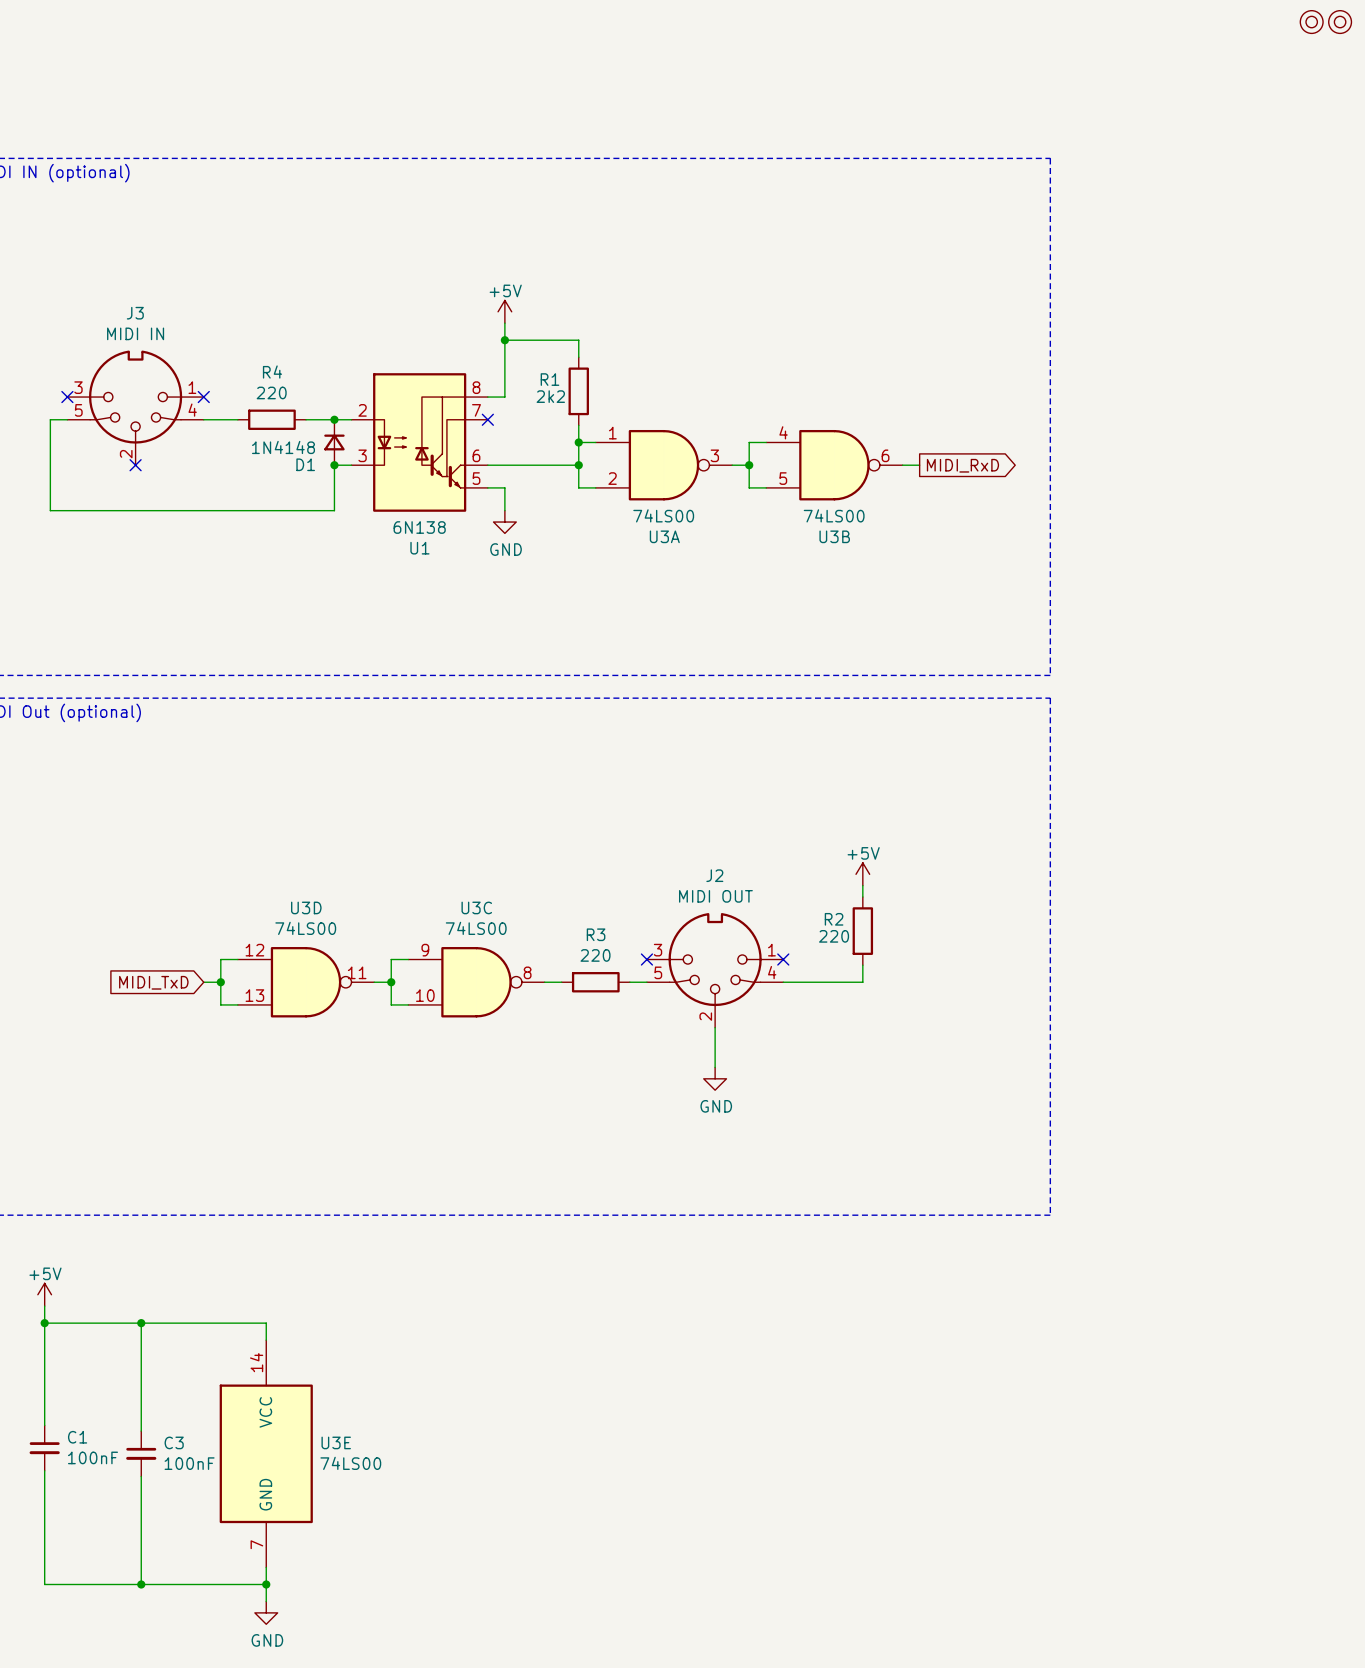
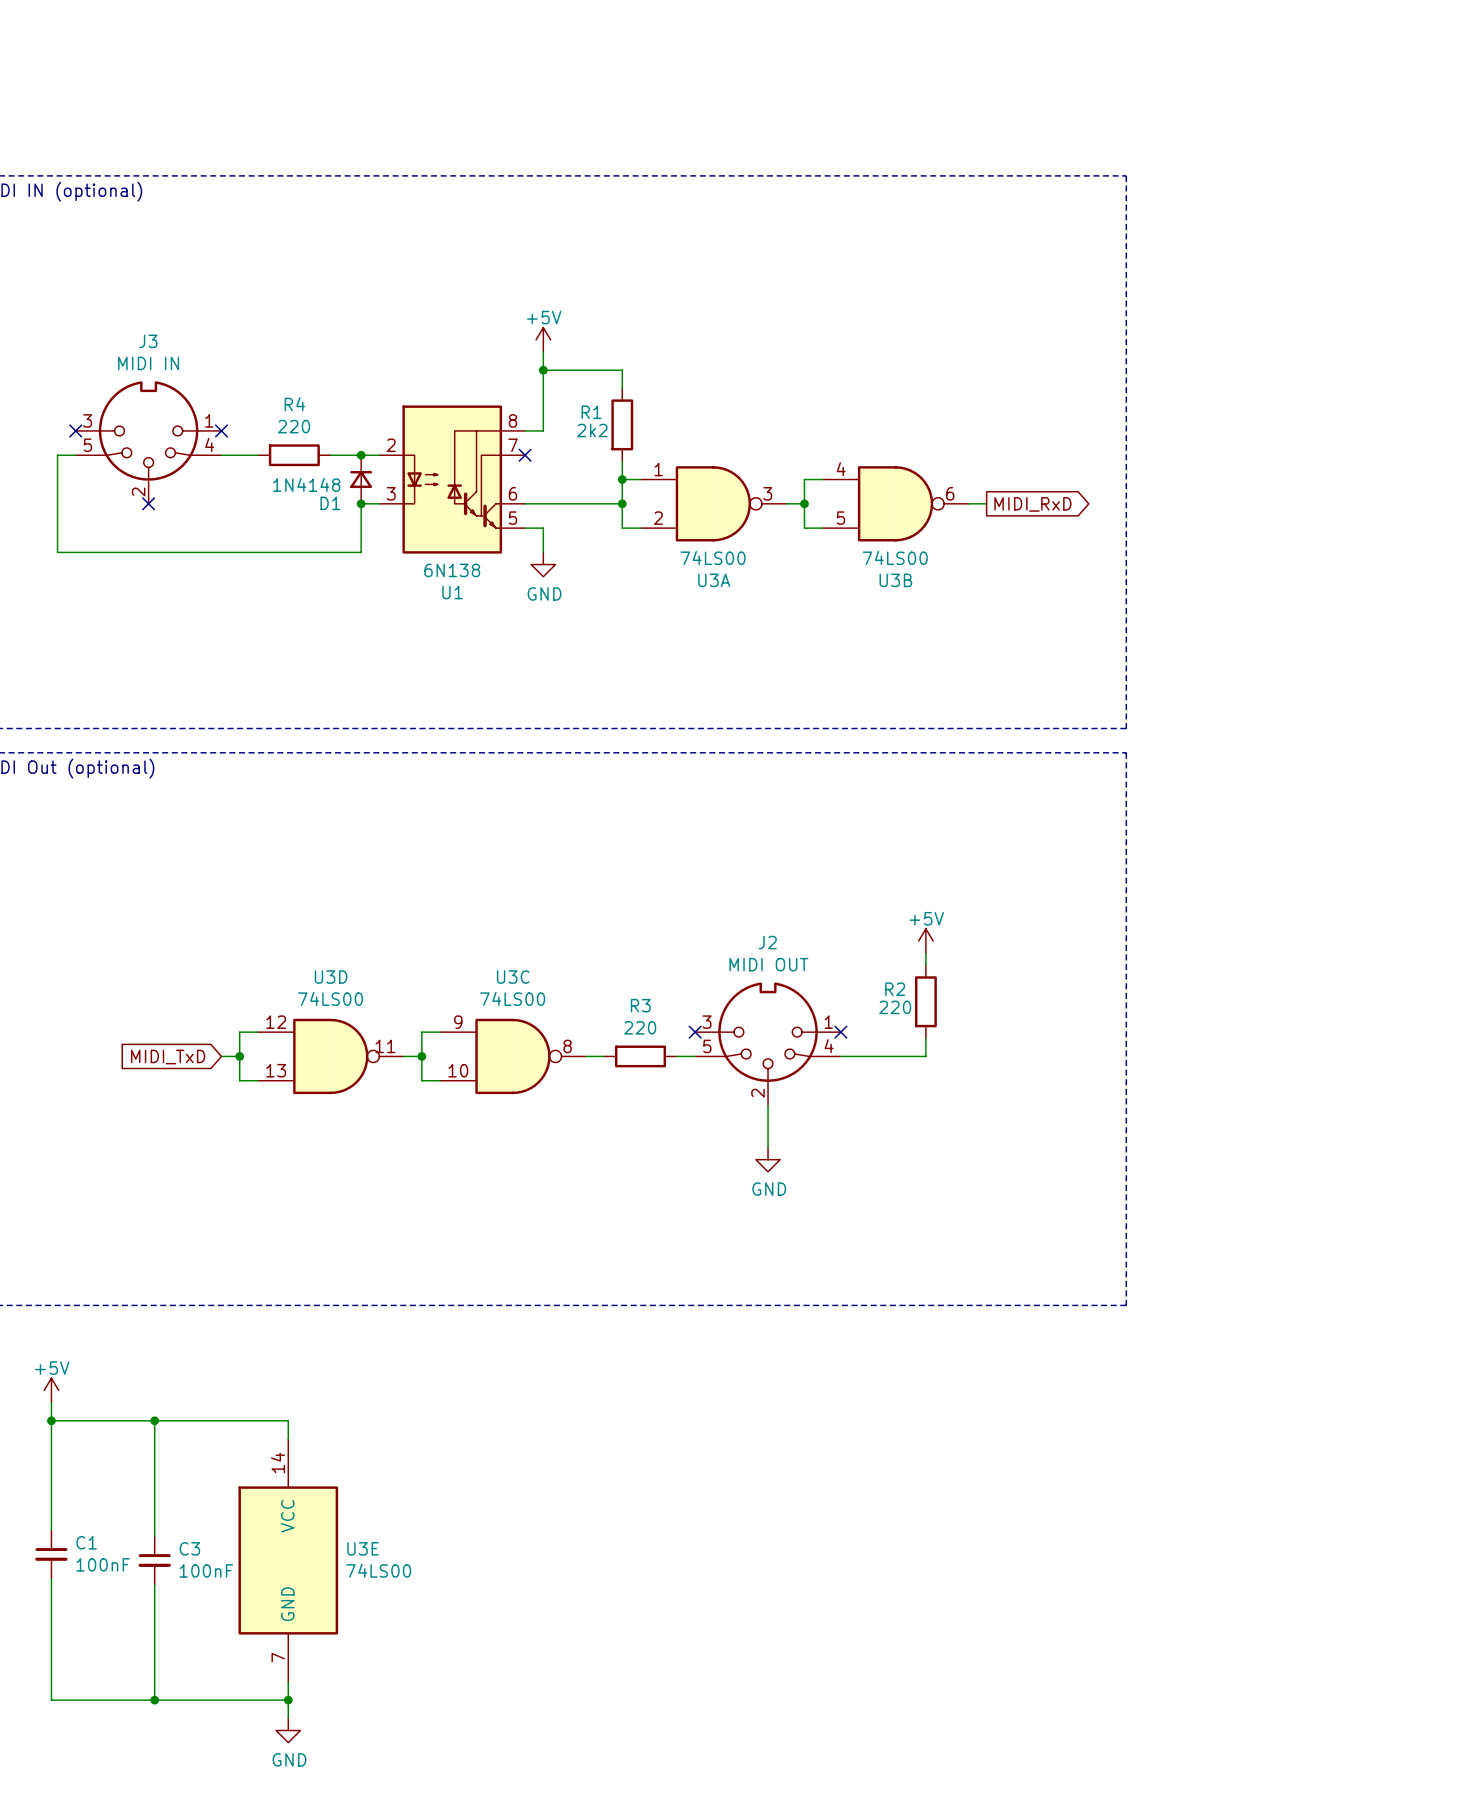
part: (1311, 22) -> none
part: (1340, 22) -> none

